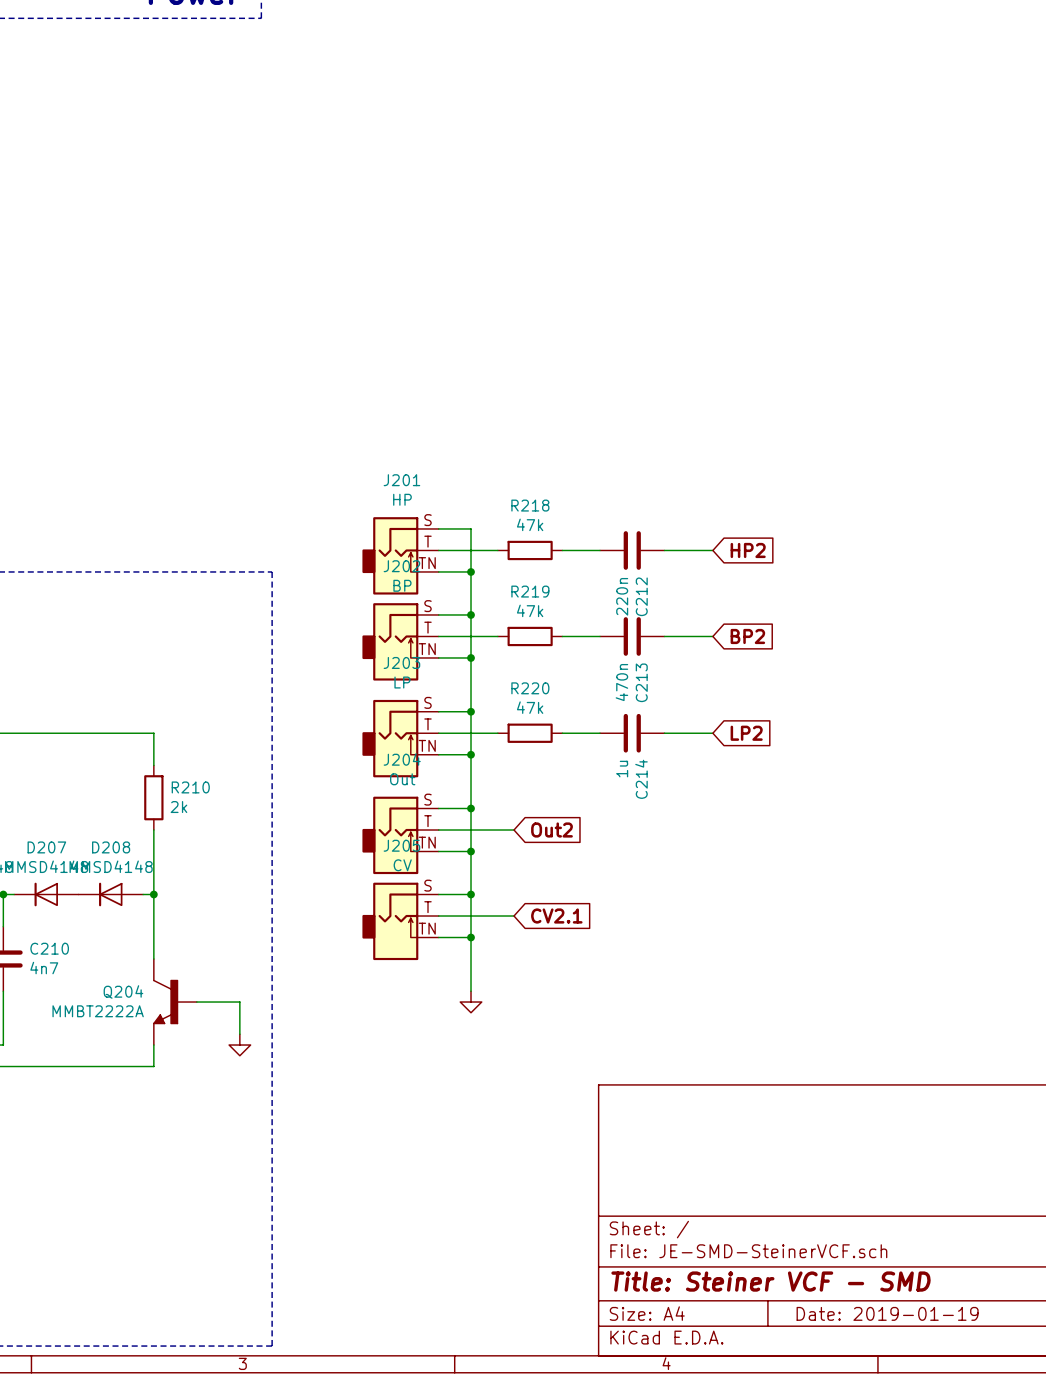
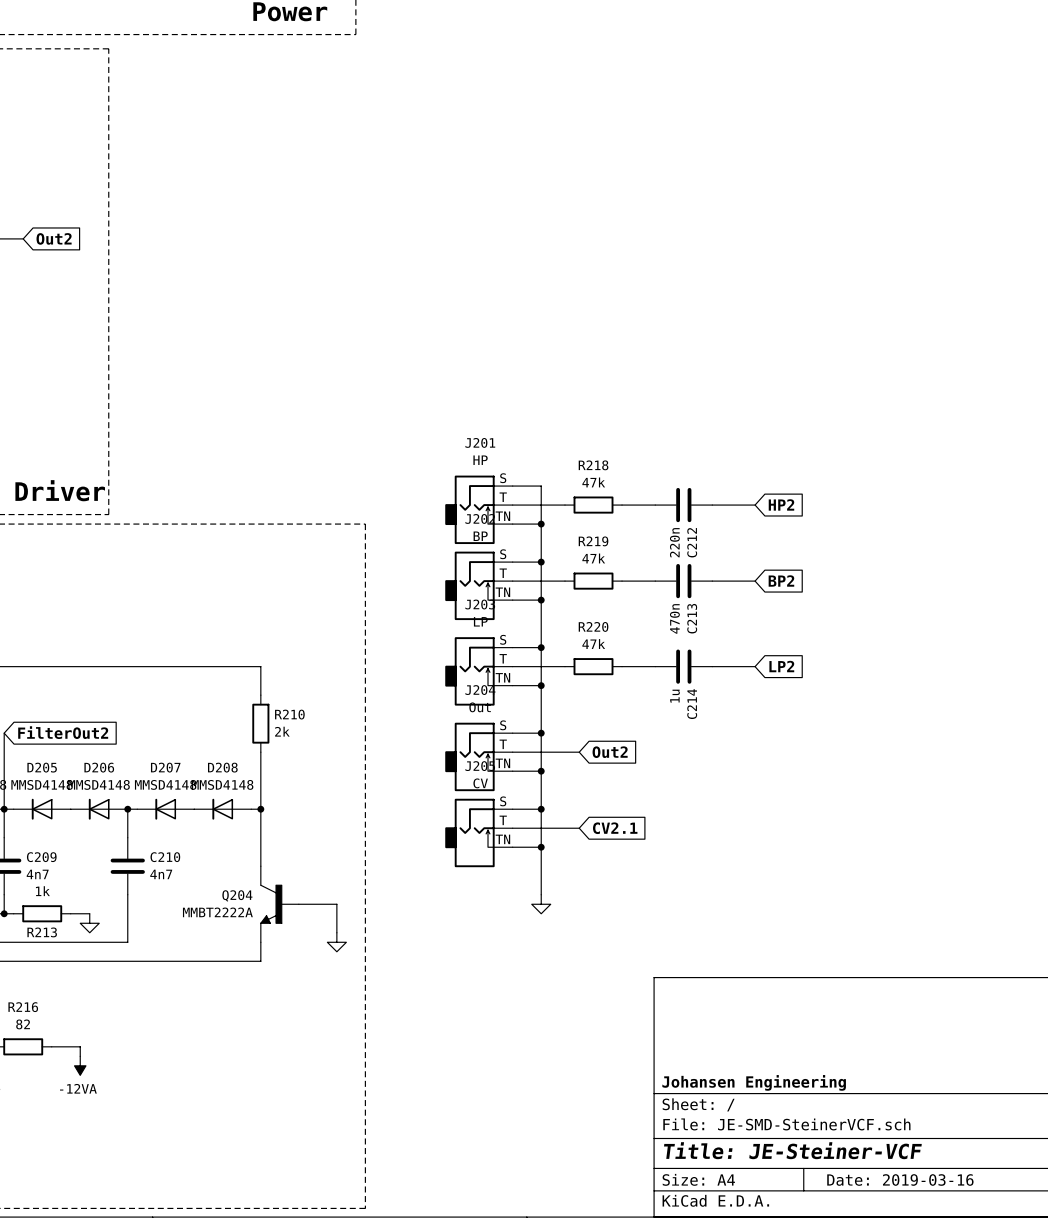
title block: none -> Johansen Engineering (754, 1082)
title block: Title: Steiner VCF - SMD (771, 1281) -> Title: JE-Steiner-VCF (792, 1150)
title block: Date: 2019-01-19 (887, 1313) -> Date: 2019-03-16 (900, 1179)

